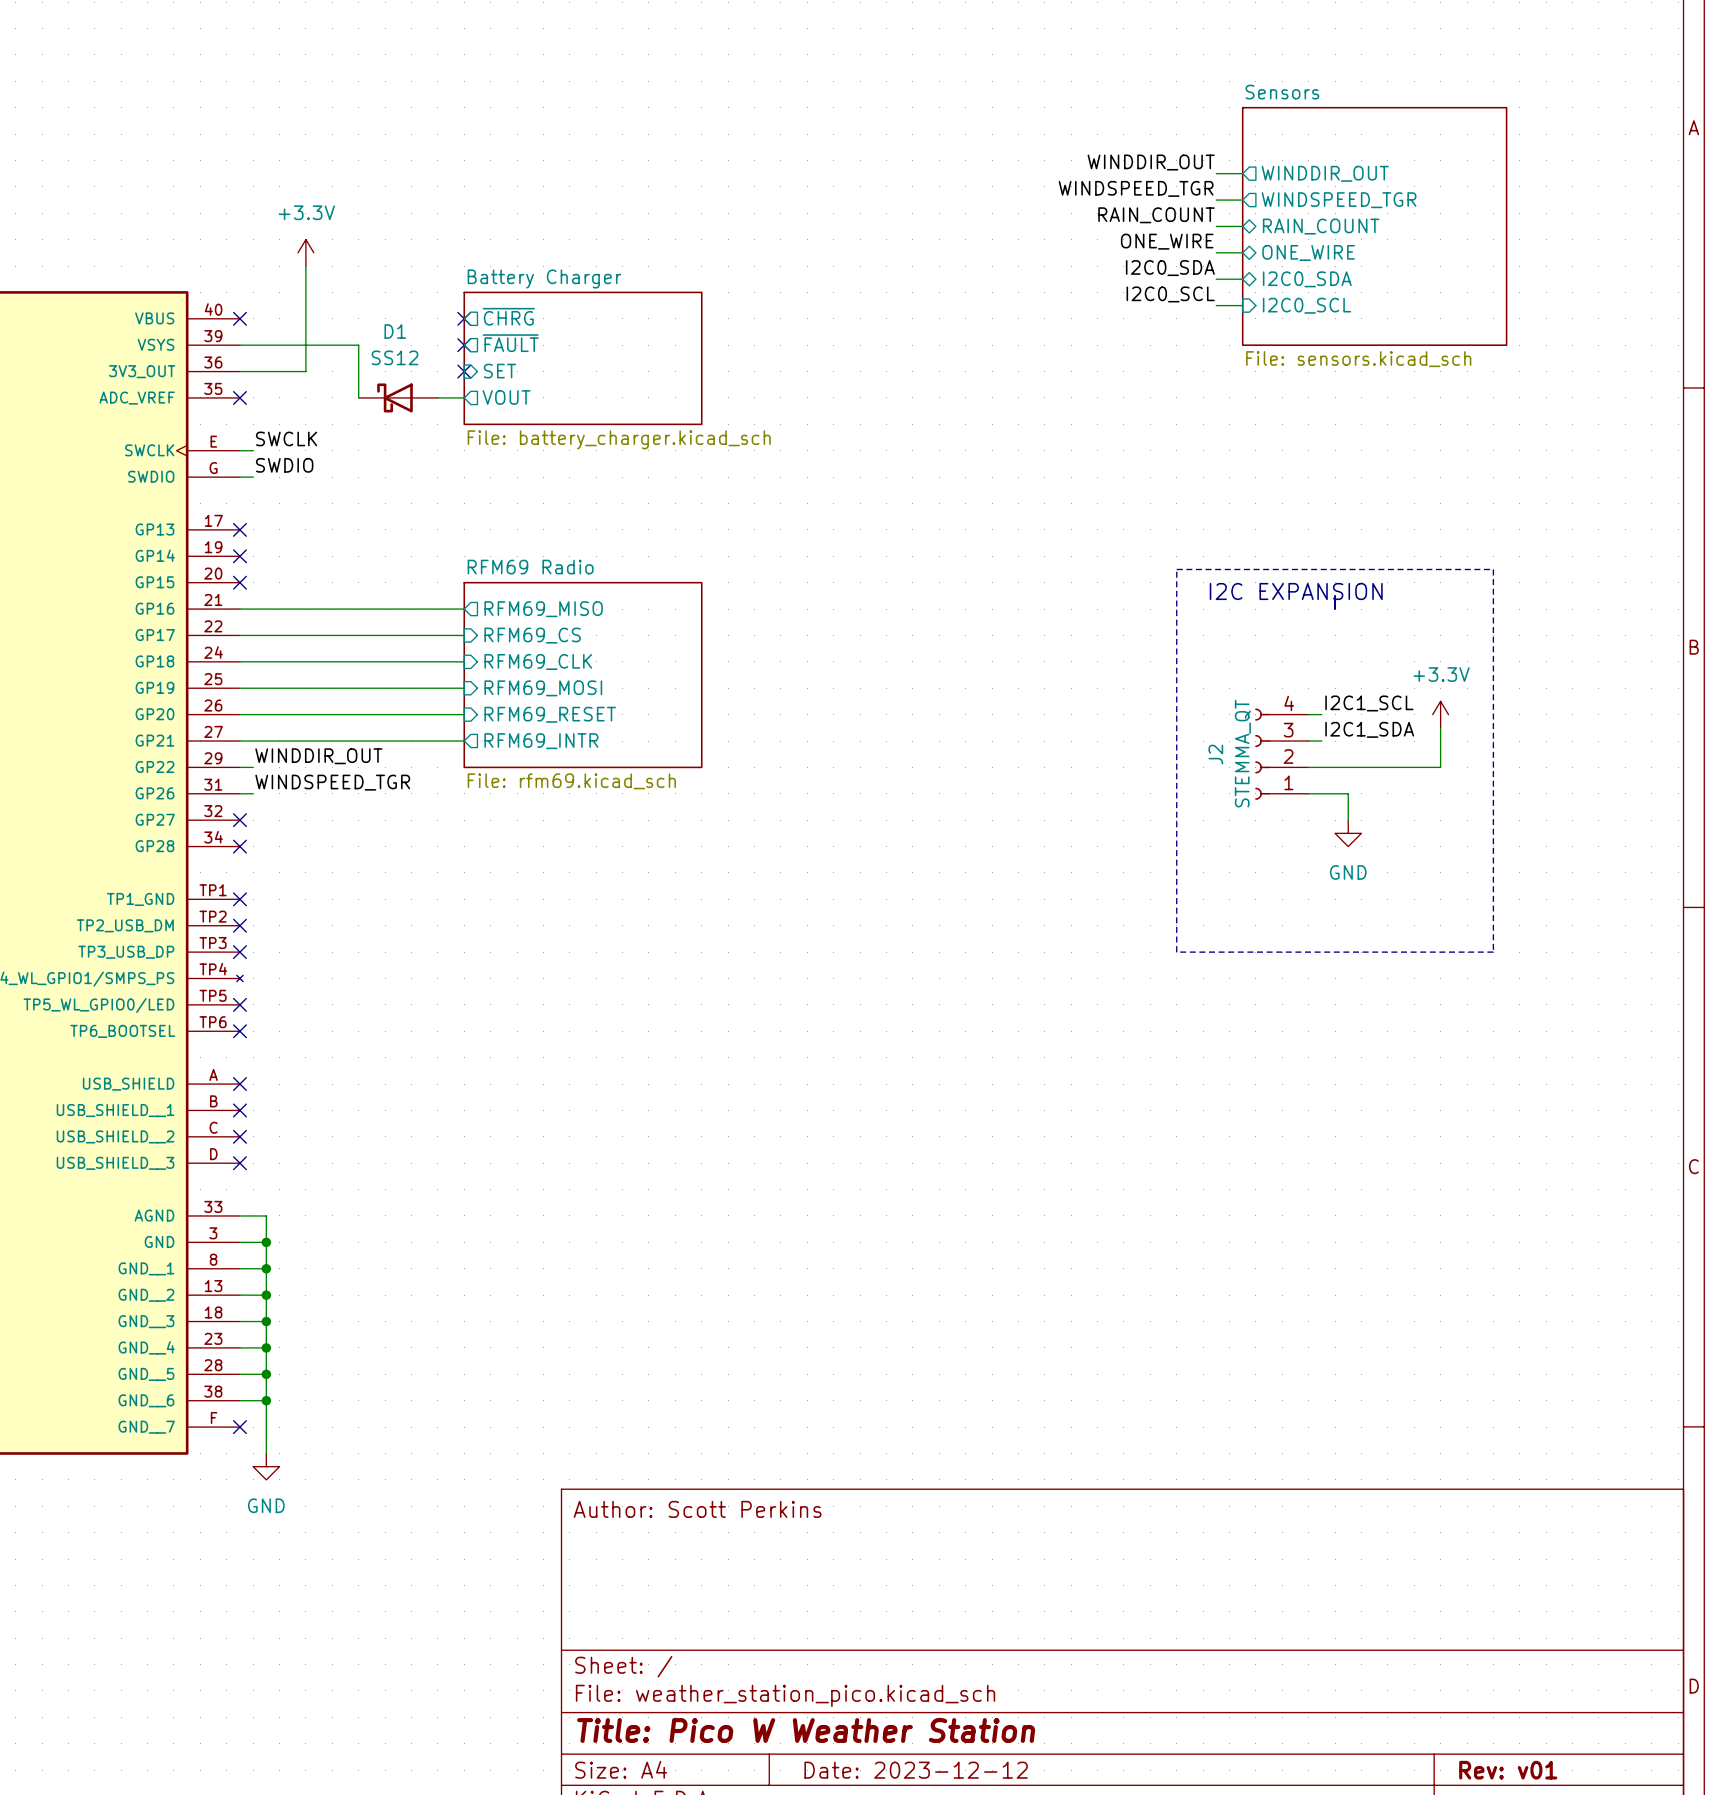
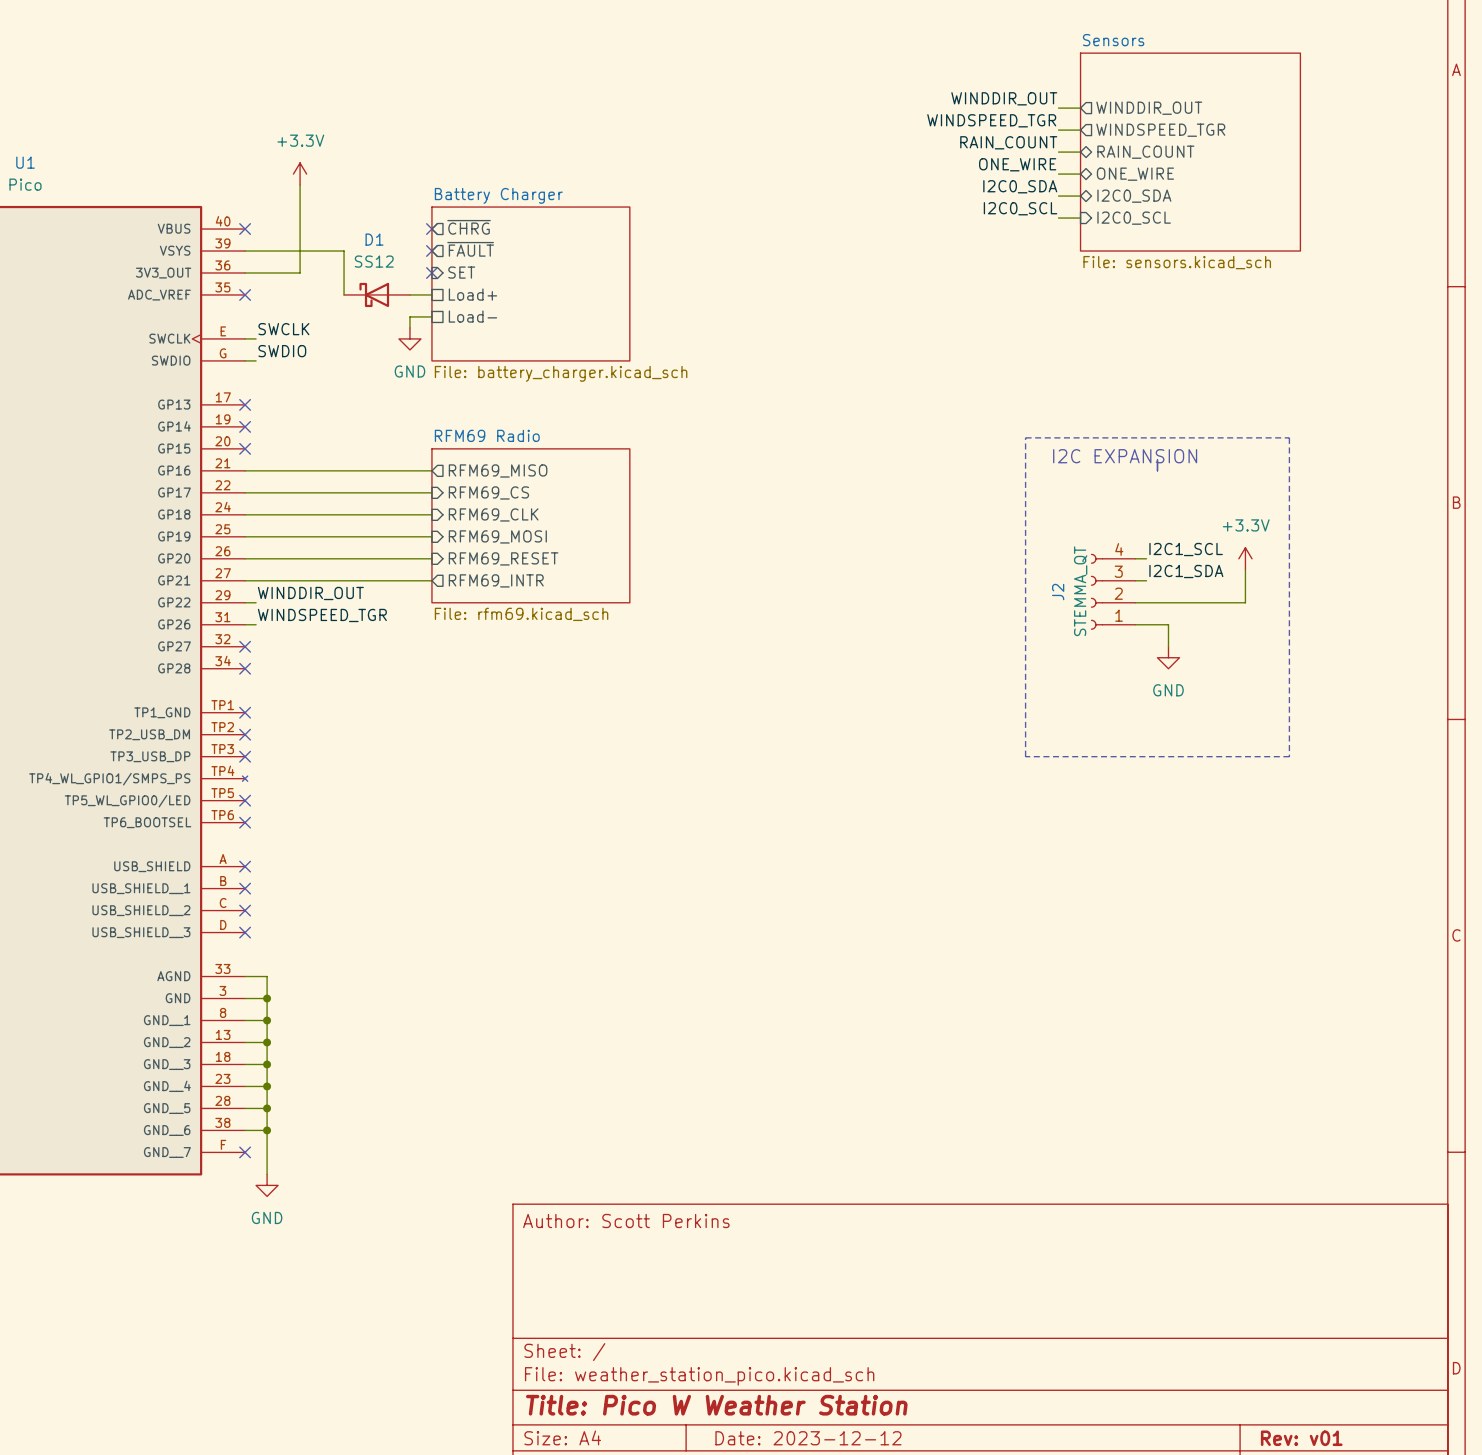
sheet Battery Charger: File: battery_charger.kicad_sch (583, 358) -> none
sheet Battery Charger: none -> File: battery_charger.kicad_sch (530, 283)
sheet pin shape: output (506, 397) -> passive (472, 294)
sheet pin: VOUT (506, 397) -> Load+ (472, 294)
sheet pin: none -> Load- (472, 316)
wire: none -> (431, 316) (409, 316) (409, 327)
power symbol: none -> GND (409, 338)

